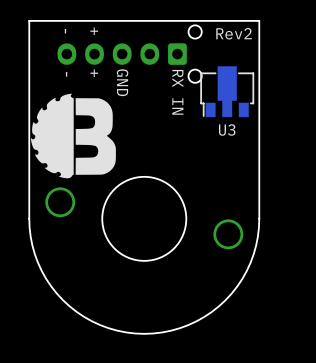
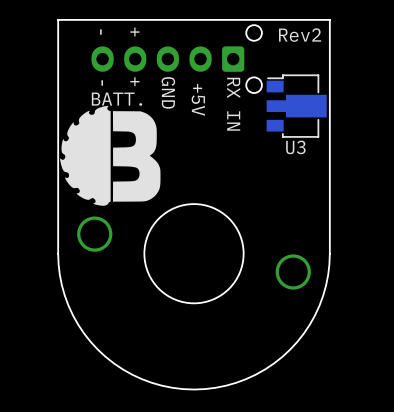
text: none -> BATT. (116, 99)
text: none -> +5V (198, 99)
U3 rotation: 0° (227, 91) -> 90° clockwise (296, 106)

